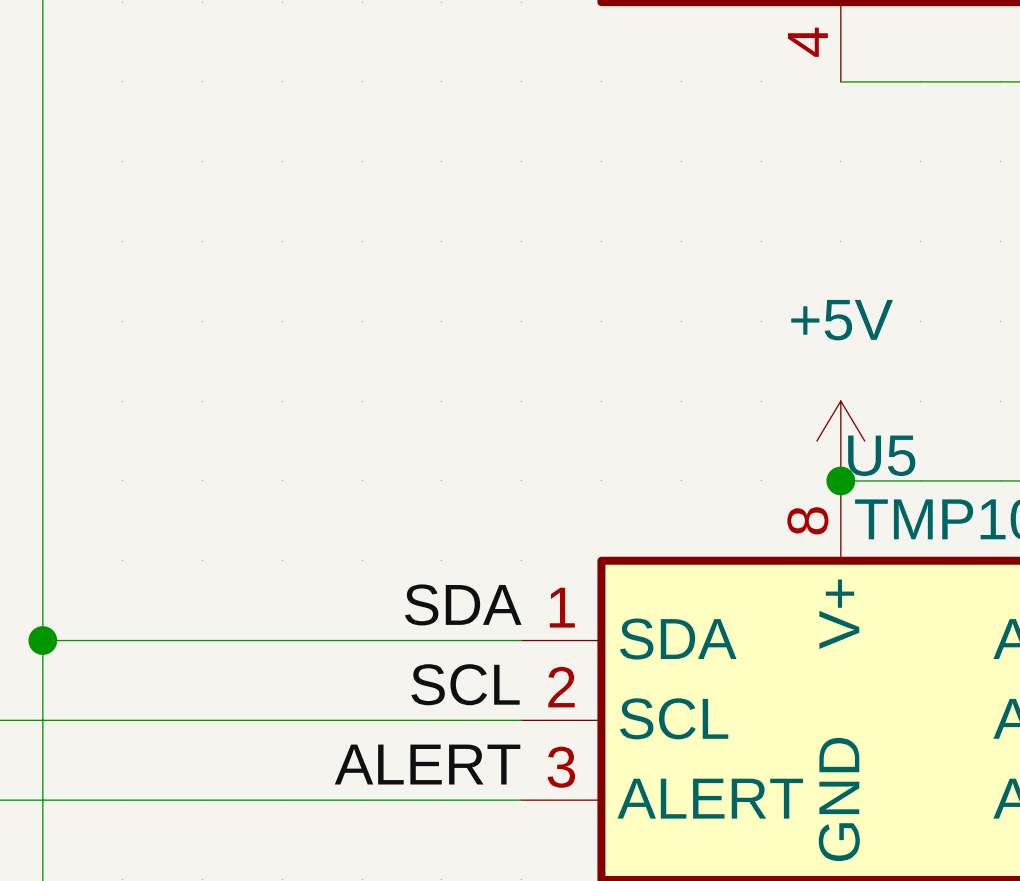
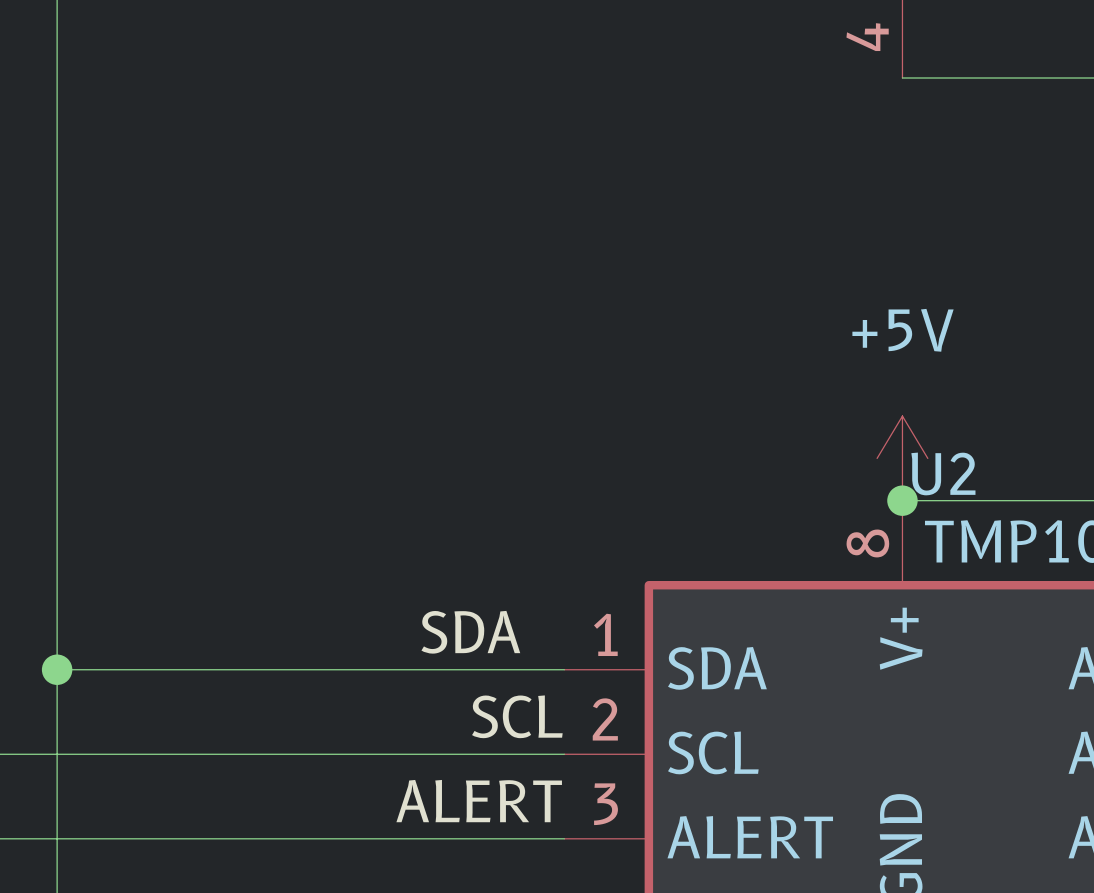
U5 name: U5 (881, 455) -> U2 (943, 473)
label position: SDA (463, 604) -> SDA (470, 632)

